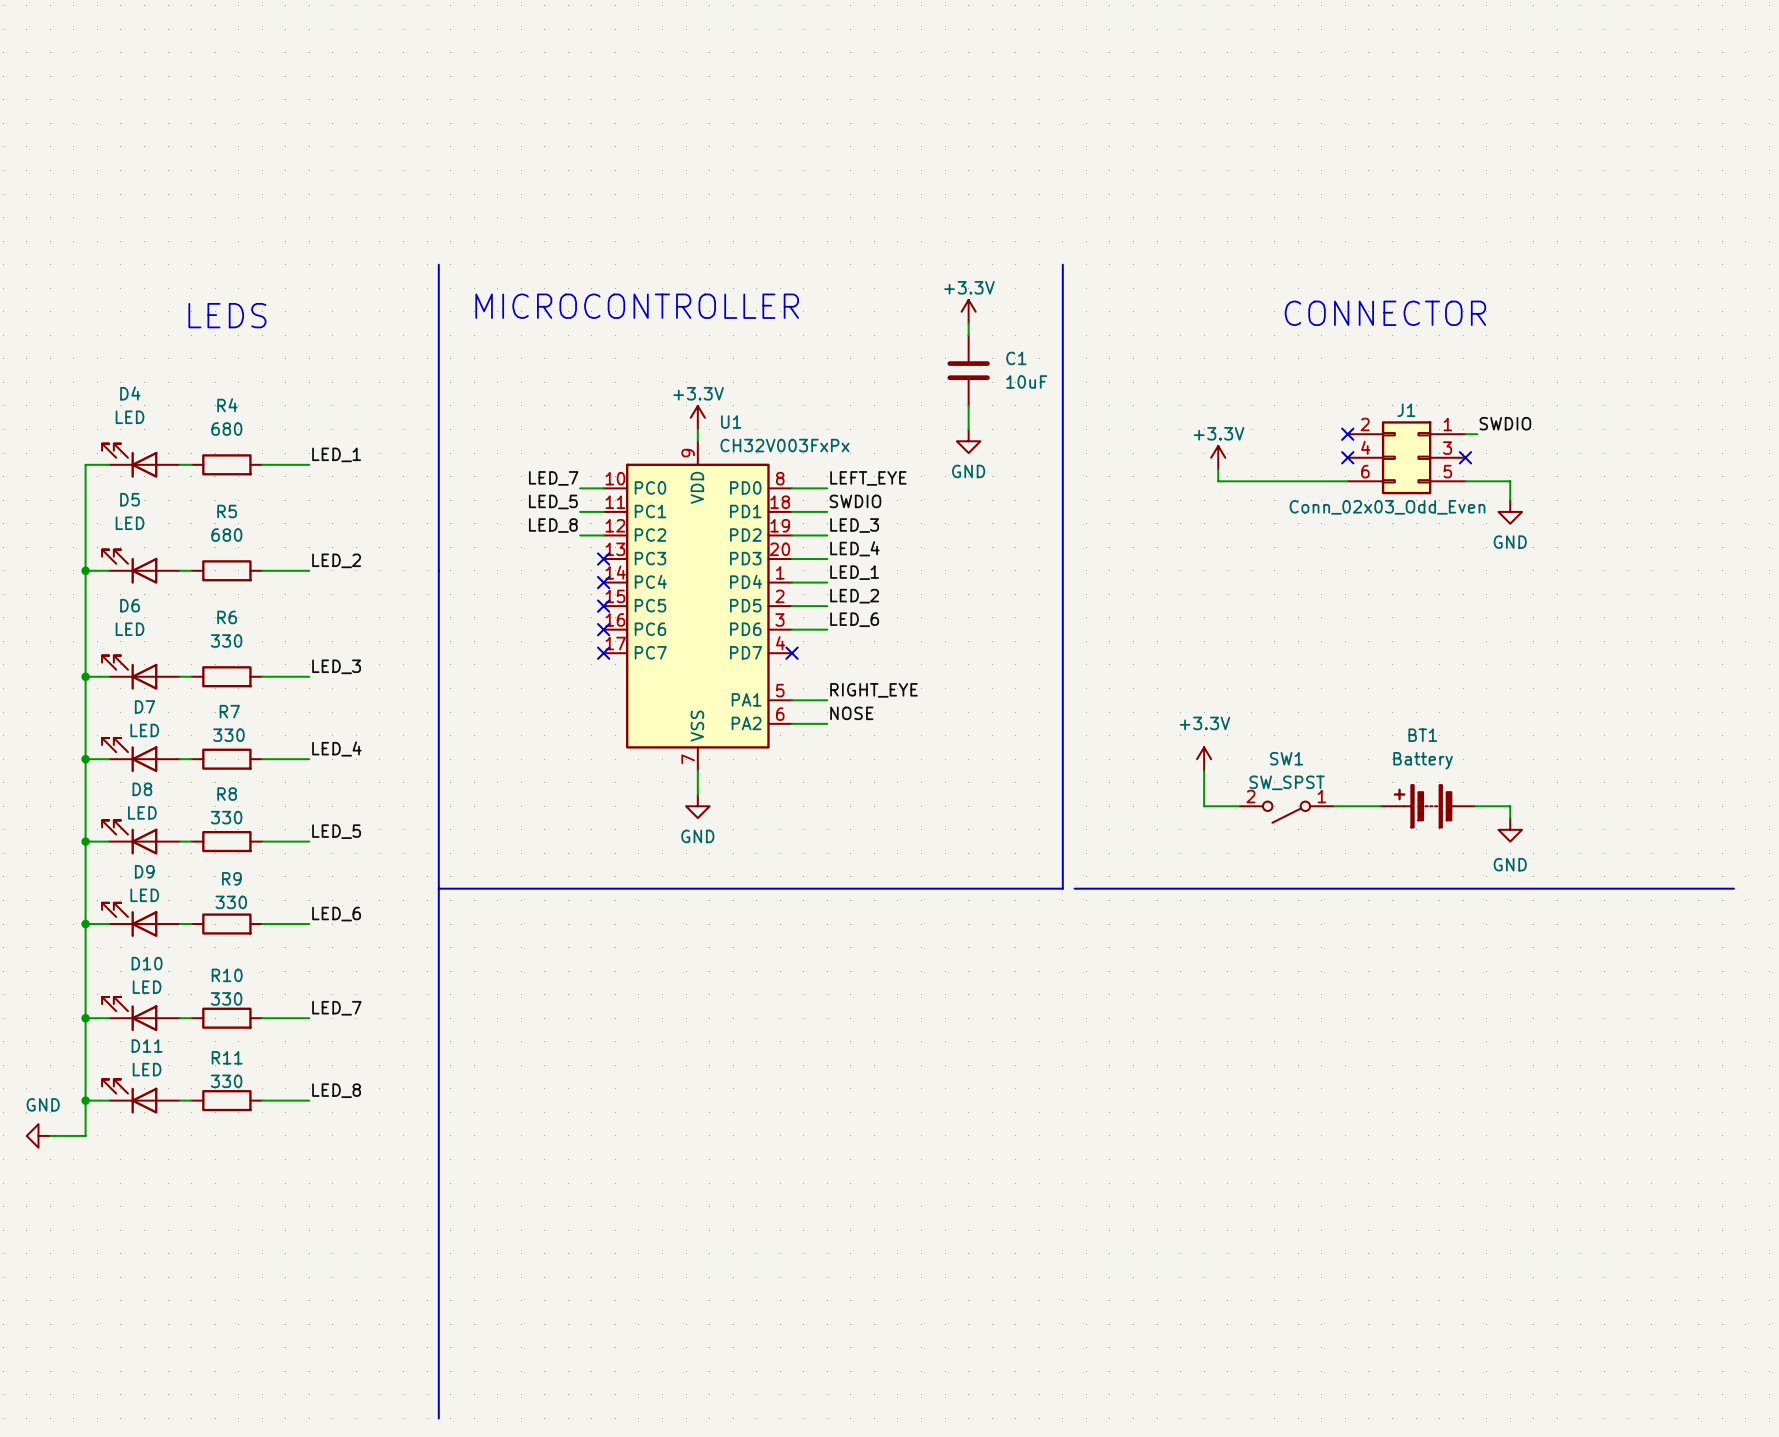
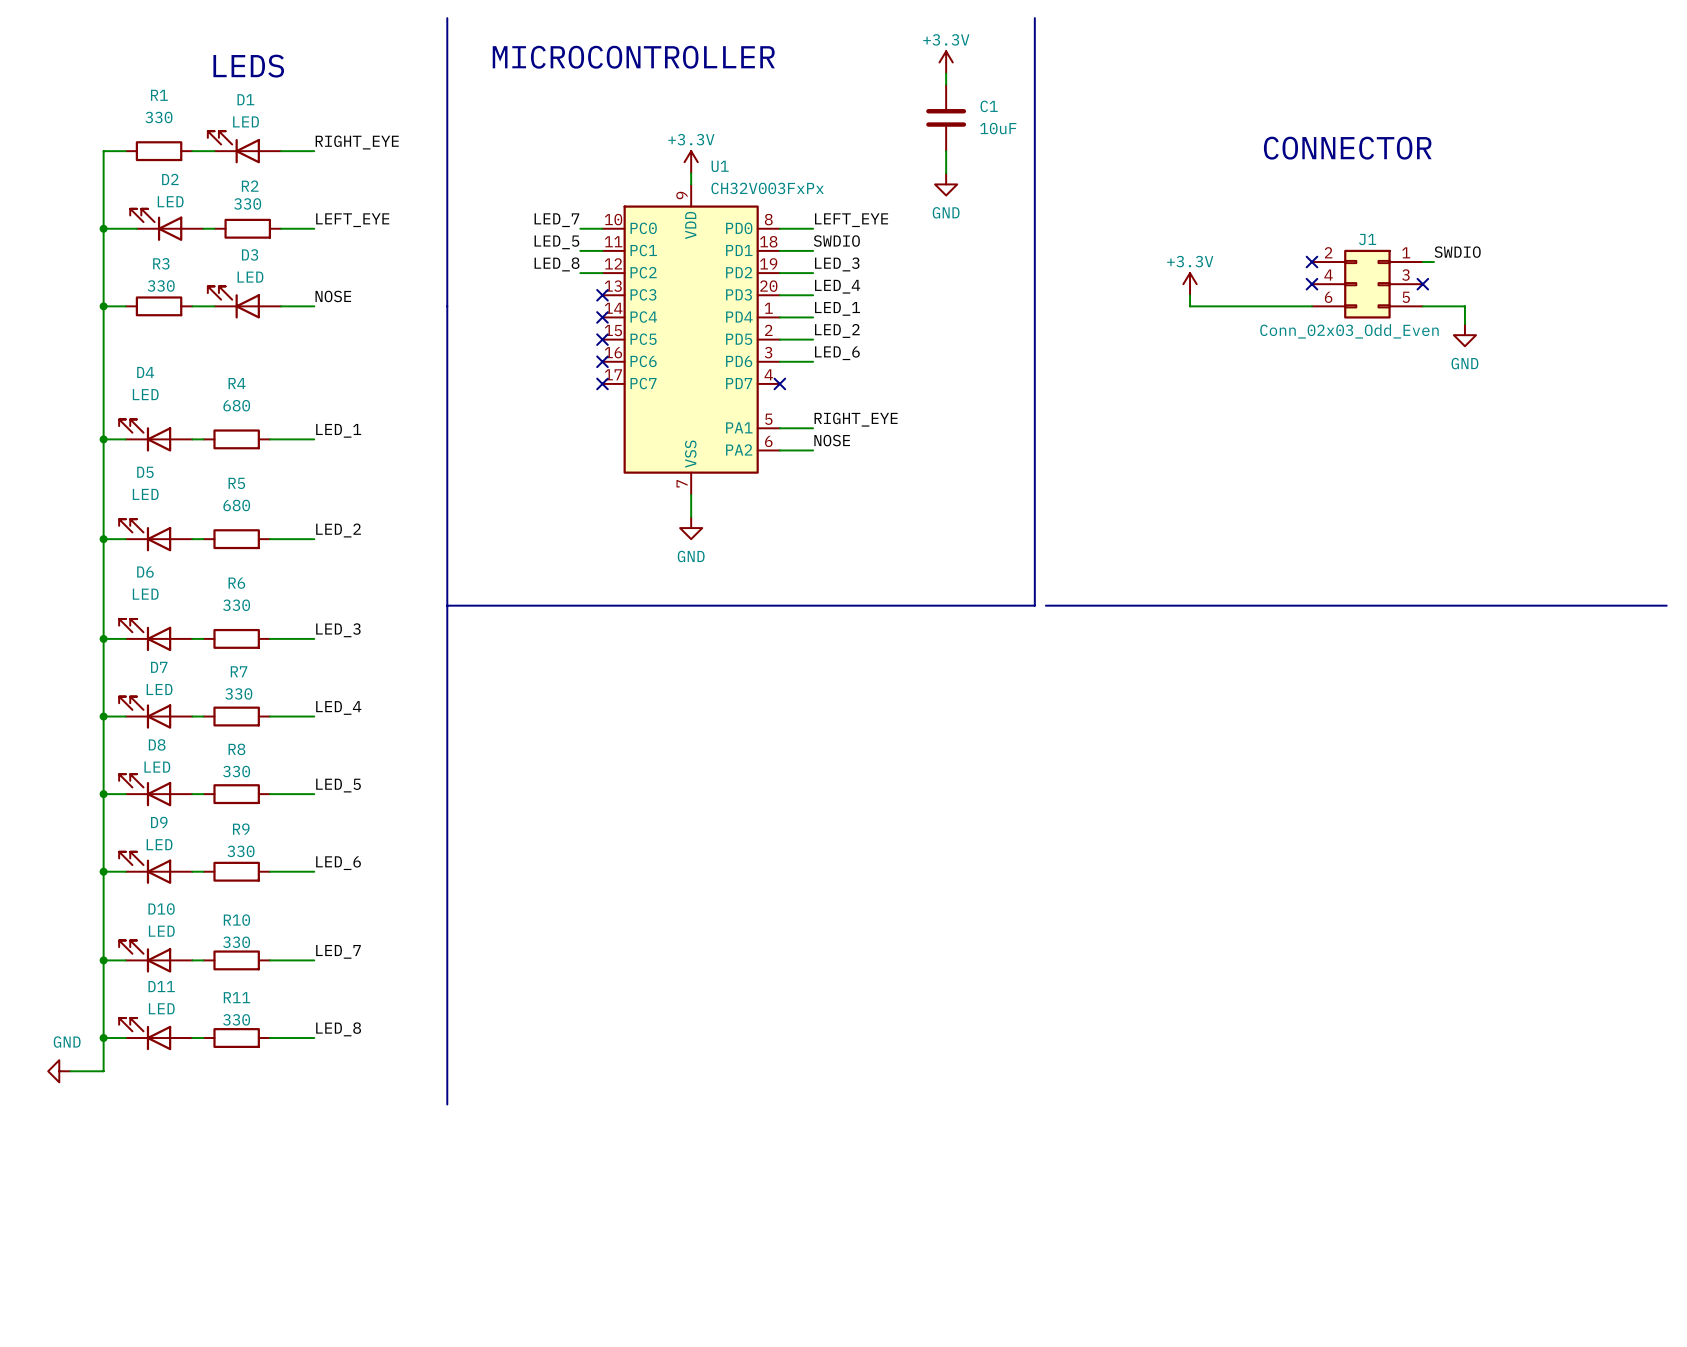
line: none -> (447, 18) (447, 1104)
line: none -> (1034, 18) (1034, 605) (447, 605)
text: none -> MICROCONTROLLER (633, 57)
power symbol: none -> +3.3V (946, 62)
text: none -> LEDS (248, 66)
wire: none -> (946, 73) (946, 84)
label: none -> RIGHT_EYE (357, 142)
D1: none -> LED (244, 147)
wire: none -> (125, 151) (103, 151) (103, 439)
R1: none -> 330 (159, 151)
wire: none -> (192, 151) (214, 151)
wire: none -> (281, 151) (314, 151)
wire: none -> (946, 151) (946, 173)
power symbol: none -> +3.3V (691, 162)
wire: none -> (691, 173) (691, 184)
power symbol: none -> GND (946, 184)
label: none -> LEFT_EYE (352, 220)
label: none -> LED_7 (556, 220)
label: none -> LEFT_EYE (851, 220)
D2: none -> LED (166, 224)
wire: none -> (103, 228) (136, 228)
junction: none -> (103, 228)
wire: none -> (203, 228) (214, 228)
R2: none -> 330 (247, 228)
wire: none -> (281, 228) (314, 228)
wire: none -> (580, 228) (602, 228)
wire: none -> (779, 228) (813, 228)
label: none -> LED_5 (556, 242)
label: none -> SWDIO (836, 241)
line: (438, 264) (438, 1418) -> none
line: (1062, 264) (1062, 888) (438, 888) -> none
no-connect mark: none -> (1311, 262)
label: none -> LED_8 (557, 264)
label: none -> LED_3 (837, 264)
power symbol: none -> +3.3V (1190, 284)
no-connect mark: none -> (1311, 284)
no-connect mark: none -> (1422, 284)
label: none -> LED_4 (837, 286)
text: MICROCONTROLLER (637, 306) -> none
no-connect mark: none -> (602, 295)
power symbol: +3.3V (968, 311) -> none
label: none -> NOSE (333, 296)
text position: CONNECTOR (1385, 313) -> CONNECTOR (1347, 148)
text: LEDS (227, 315) -> none
D3: none -> LED (244, 302)
wire: none -> (103, 306) (125, 306)
junction: none -> (103, 306)
R3: none -> 330 (159, 306)
wire: none -> (192, 306) (214, 306)
wire: none -> (281, 306) (314, 306)
wire: (968, 323) (968, 335) -> none
label: none -> LED_1 (837, 308)
no-connect mark: none -> (602, 317)
label: none -> LED_2 (837, 330)
no-connect mark: none -> (602, 339)
C1 position: (968, 370) -> (946, 117)
label: none -> LED_6 (837, 353)
no-connect mark: none -> (602, 361)
no-connect mark: none -> (602, 383)
no-connect mark: none -> (779, 383)
wire: (968, 405) (968, 429) -> none
power symbol: +3.3V (697, 417) -> none
label position: SWDIO (1505, 423) -> SWDIO (1457, 252)
no-connect mark: (1347, 434) -> none
wire: (1465, 434) (1477, 434) -> (1422, 262) (1433, 262)
power symbol: GND (968, 441) -> none
label: none -> RIGHT_EYE (856, 419)
power symbol: +3.3V (1218, 457) -> none
no-connect mark: (1347, 457) -> none
J1 position: (1406, 457) -> (1367, 284)
no-connect mark: (1465, 457) -> none
junction: none -> (103, 439)
label: none -> NOSE (832, 440)
wire: (1218, 469) (1218, 481) (1347, 481) -> (1190, 295) (1190, 306) (1311, 306)
label: LED_7 (553, 478) -> none
label: LEFT_EYE (868, 478) -> none
wire: (1465, 481) (1510, 481) (1510, 500) -> (1422, 306) (1464, 306) (1464, 324)
wire: (580, 488) (603, 488) -> (580, 250) (602, 250)
wire: (792, 488) (827, 488) -> (779, 250) (813, 250)
label: LED_5 (553, 501) -> none
label: SWDIO (855, 501) -> none
wire: (580, 511) (603, 511) -> (580, 273) (602, 273)
wire: (792, 511) (827, 511) -> (779, 273) (813, 273)
power symbol position: GND (1510, 511) -> GND (1464, 335)
label: LED_8 (553, 525) -> none
label: LED_3 (854, 525) -> none
wire: (580, 535) (603, 535) -> none
wire: (792, 535) (827, 535) -> (779, 295) (813, 295)
label: LED_4 (854, 548) -> none
no-connect mark: (603, 559) -> none
power symbol: none -> GND (691, 528)
wire: (792, 559) (827, 559) -> (779, 317) (813, 317)
label: LED_1 (854, 572) -> none
no-connect mark: (603, 582) -> none
wire: (792, 582) (827, 582) -> (779, 339) (813, 339)
label: LED_2 (854, 596) -> none
no-connect mark: (603, 606) -> none
U1 position: (697, 606) -> (691, 339)
wire: (792, 606) (827, 606) -> (779, 361) (813, 361)
label: LED_6 (854, 619) -> none
no-connect mark: (603, 629) -> none
wire: (792, 629) (827, 629) -> (779, 428) (813, 428)
line: none -> (1045, 605) (1666, 605)
no-connect mark: (603, 653) -> none
no-connect mark: (792, 653) -> none
label: RIGHT_EYE (873, 690) -> none
wire: (792, 700) (827, 700) -> (779, 450) (813, 450)
label: NOSE (851, 713) -> none
wire: (792, 723) (827, 723) -> none
power symbol: +3.3V (1204, 759) -> none
wire: (697, 770) (697, 794) -> none
wire: (1204, 770) (1204, 806) (1239, 806) -> none
power symbol: GND (697, 806) -> none
wire: (1333, 806) (1380, 806) -> none
BT1: Battery (1427, 806) -> none
wire: (1474, 806) (1510, 806) (1510, 818) -> none
SW1: SW_SPST (1286, 812) -> none
power symbol: GND (1510, 829) -> none
line: (1074, 888) (1733, 888) -> none

